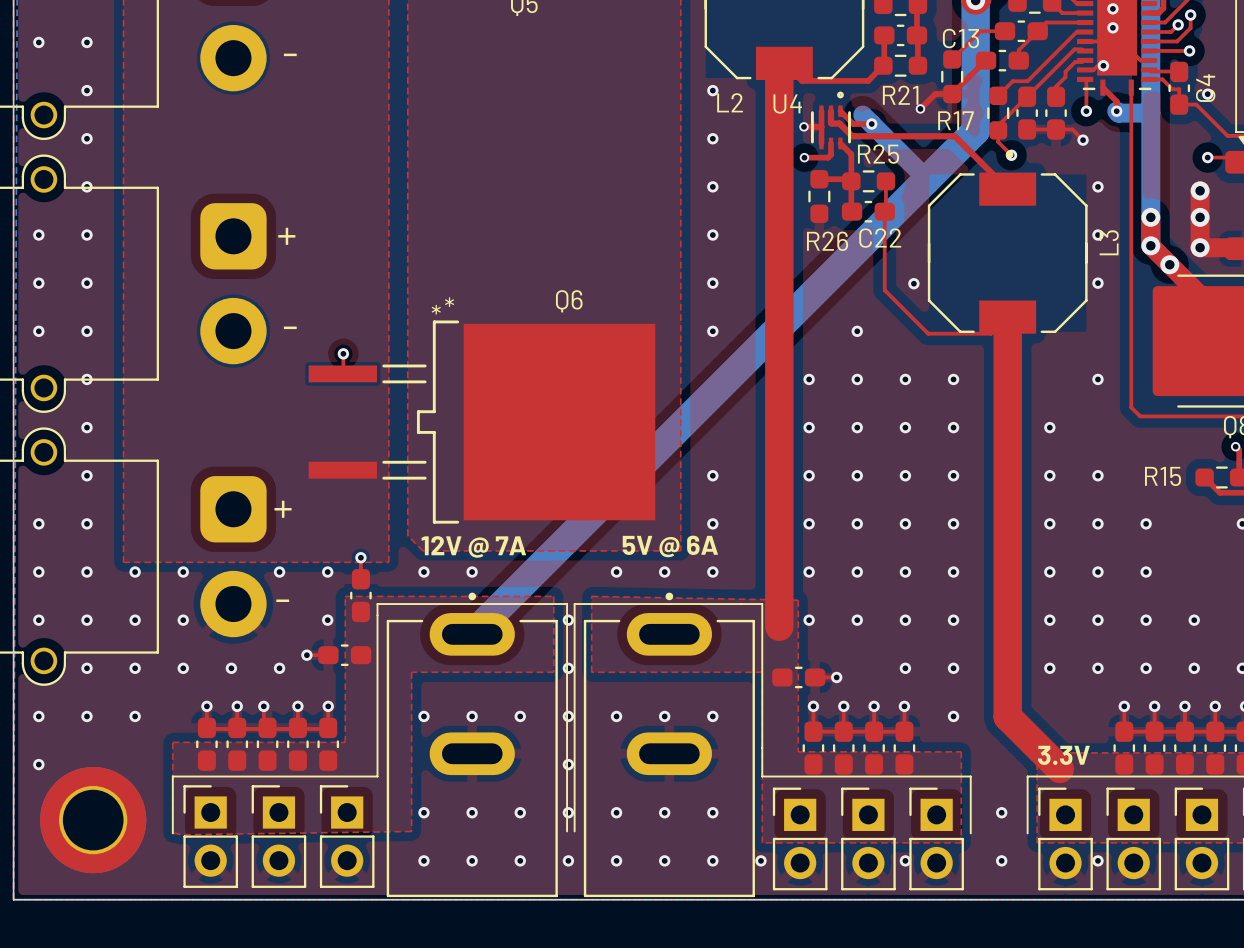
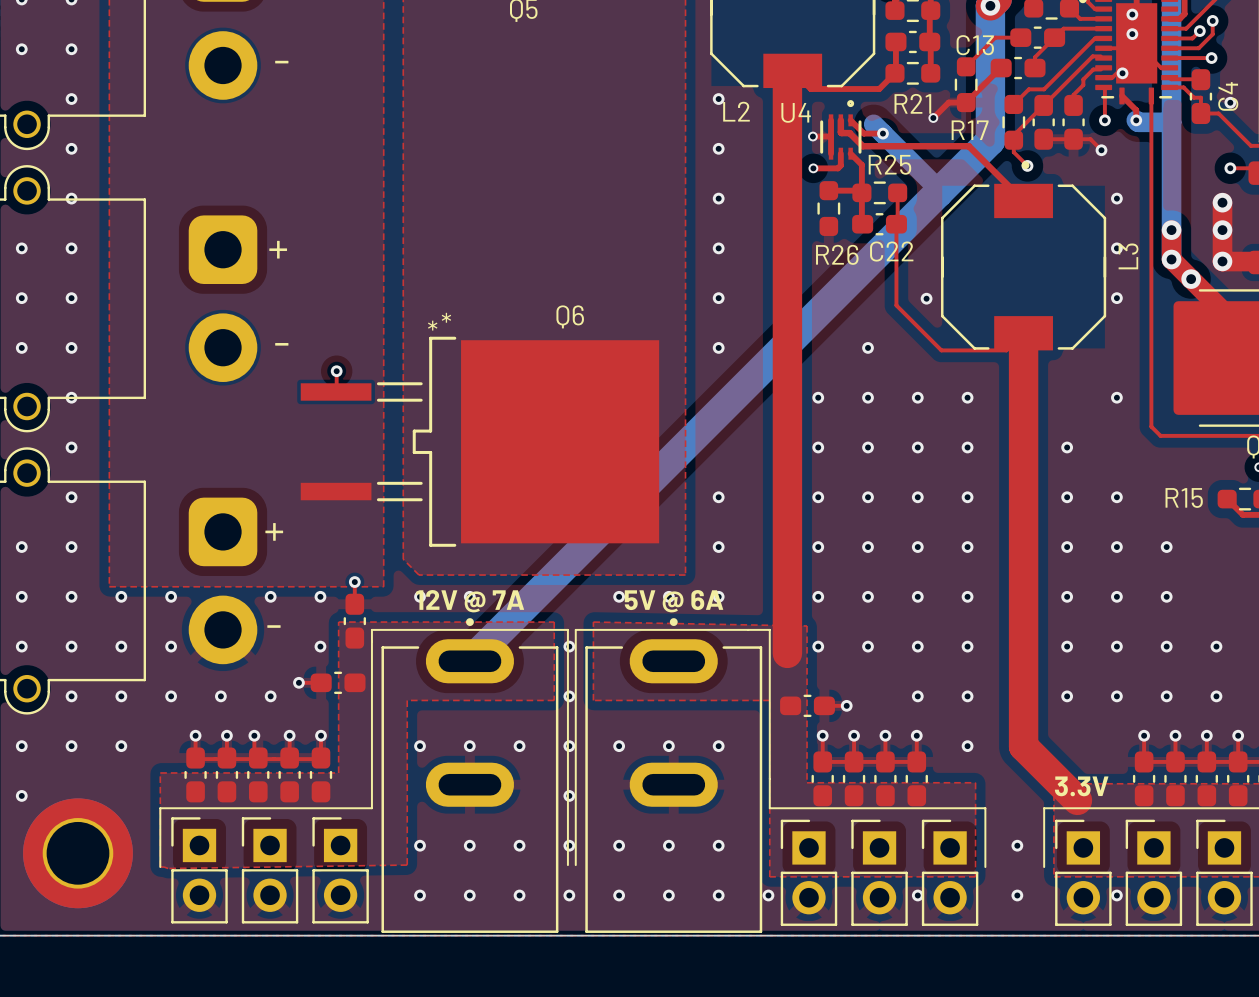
text position: 12V @ 7A (473, 546) -> 12V @ 7A (470, 601)
text position: 5V @ 6A (670, 546) -> 5V @ 6A (673, 601)

